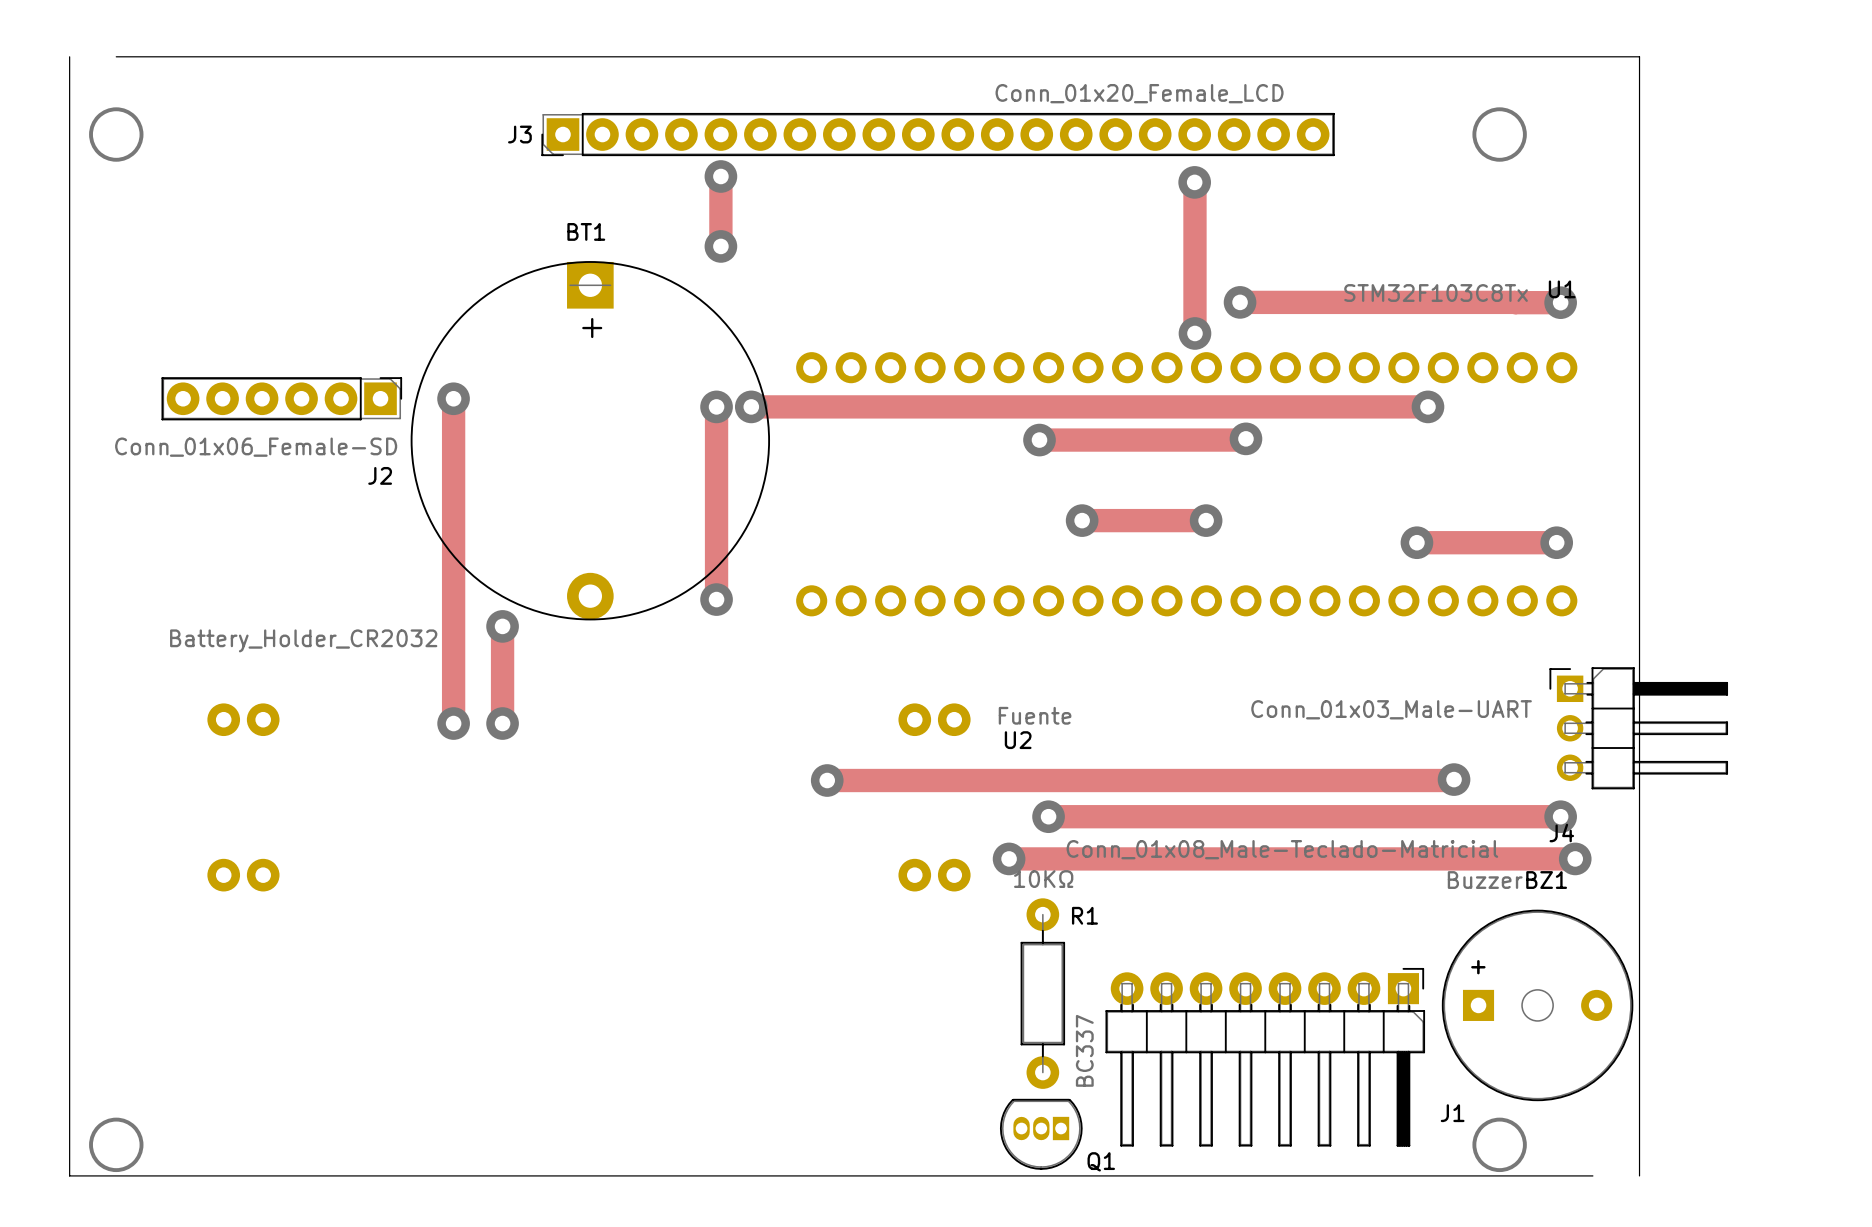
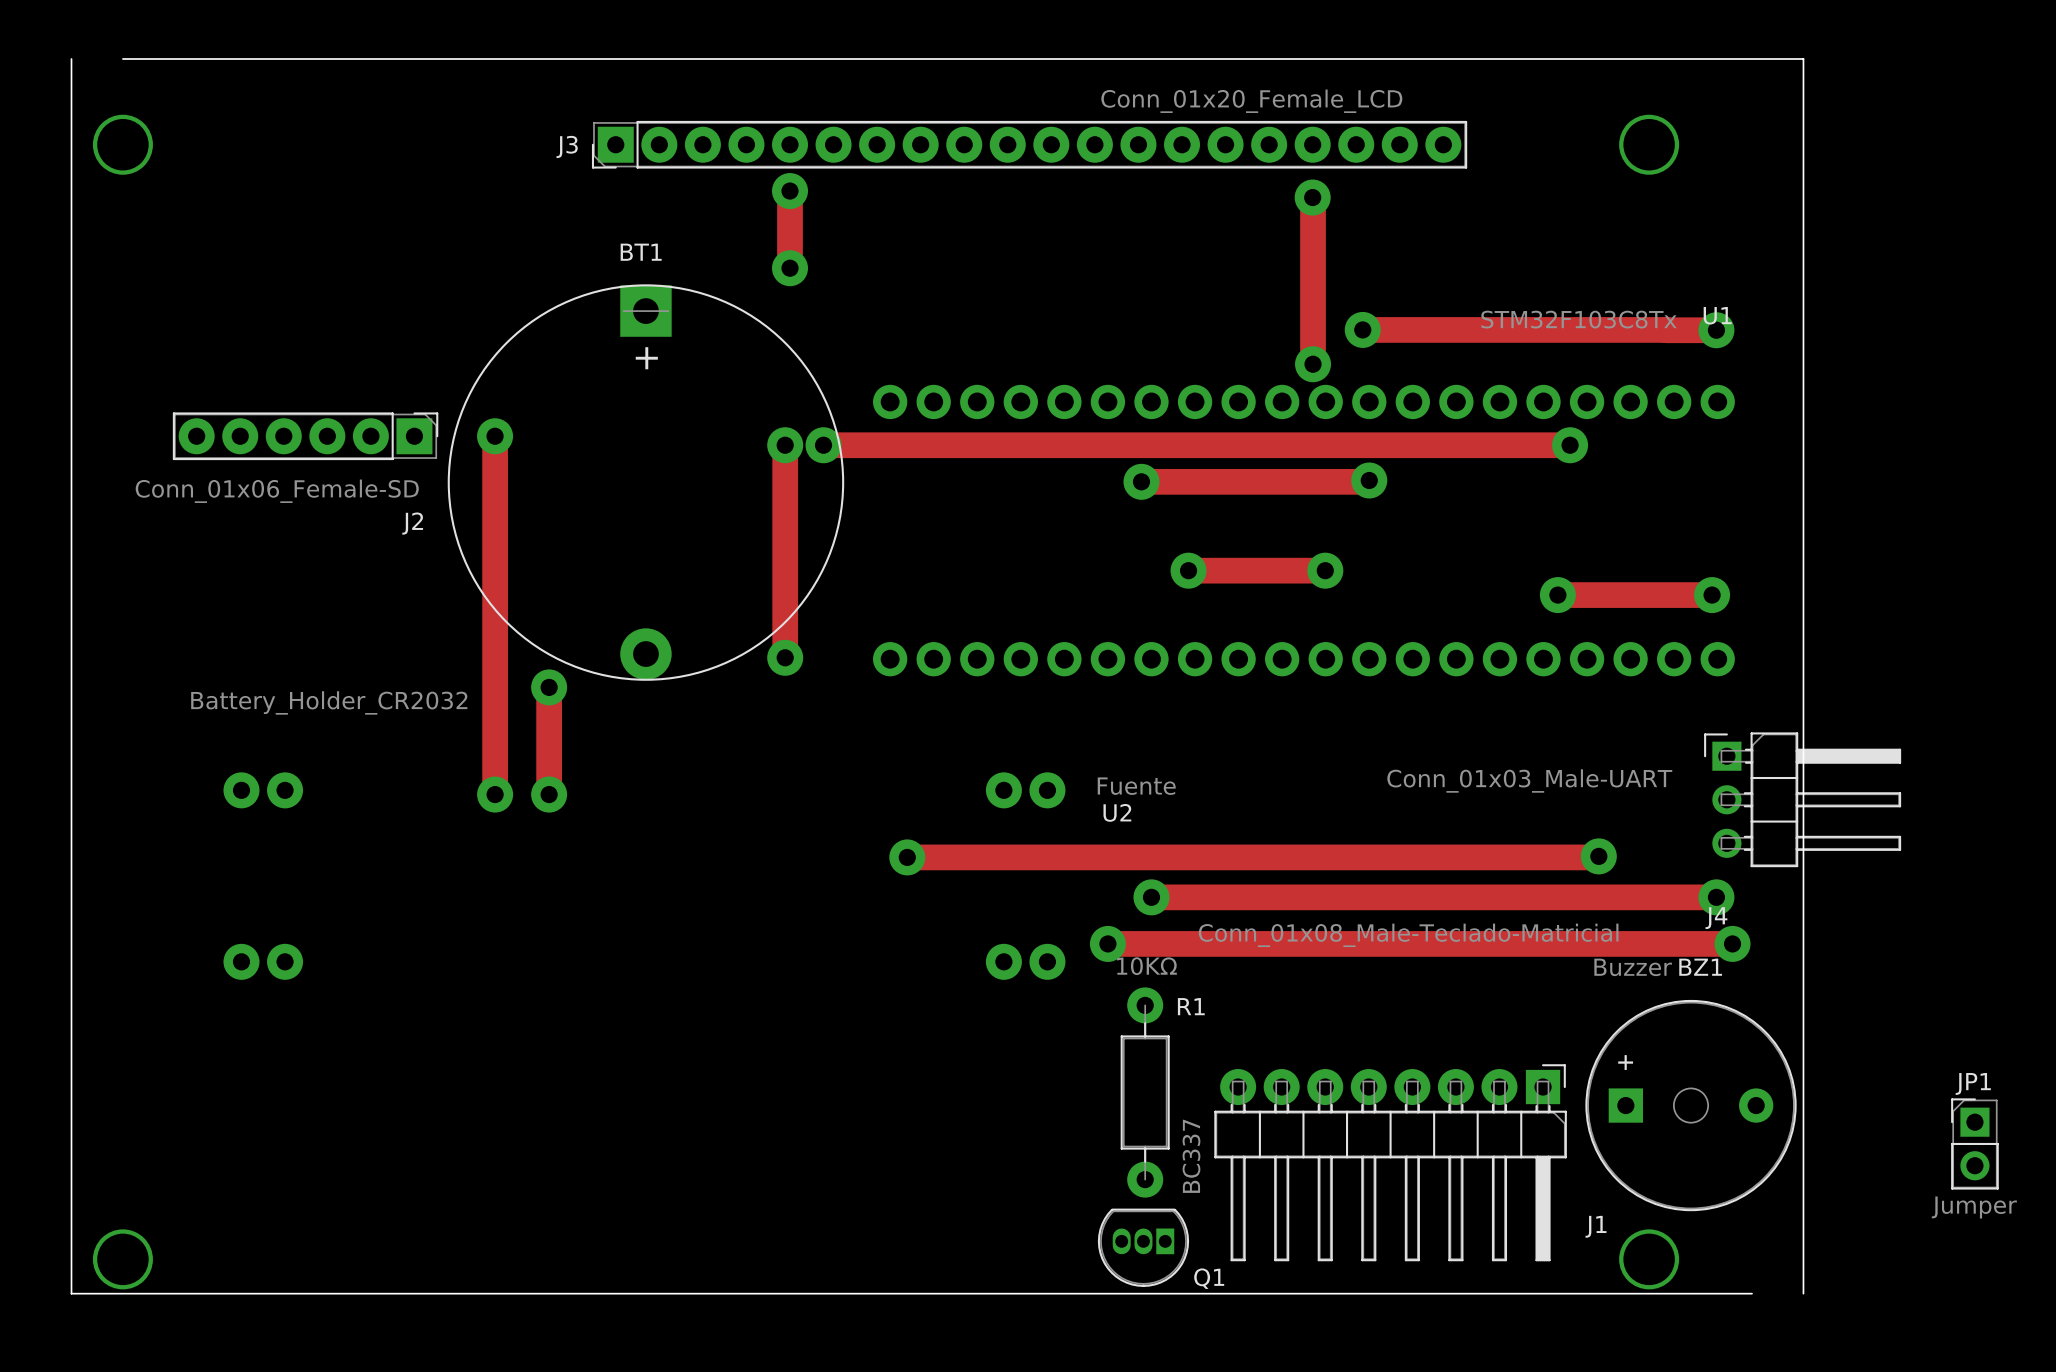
JP1: none -> Jumper (1974, 1143)

